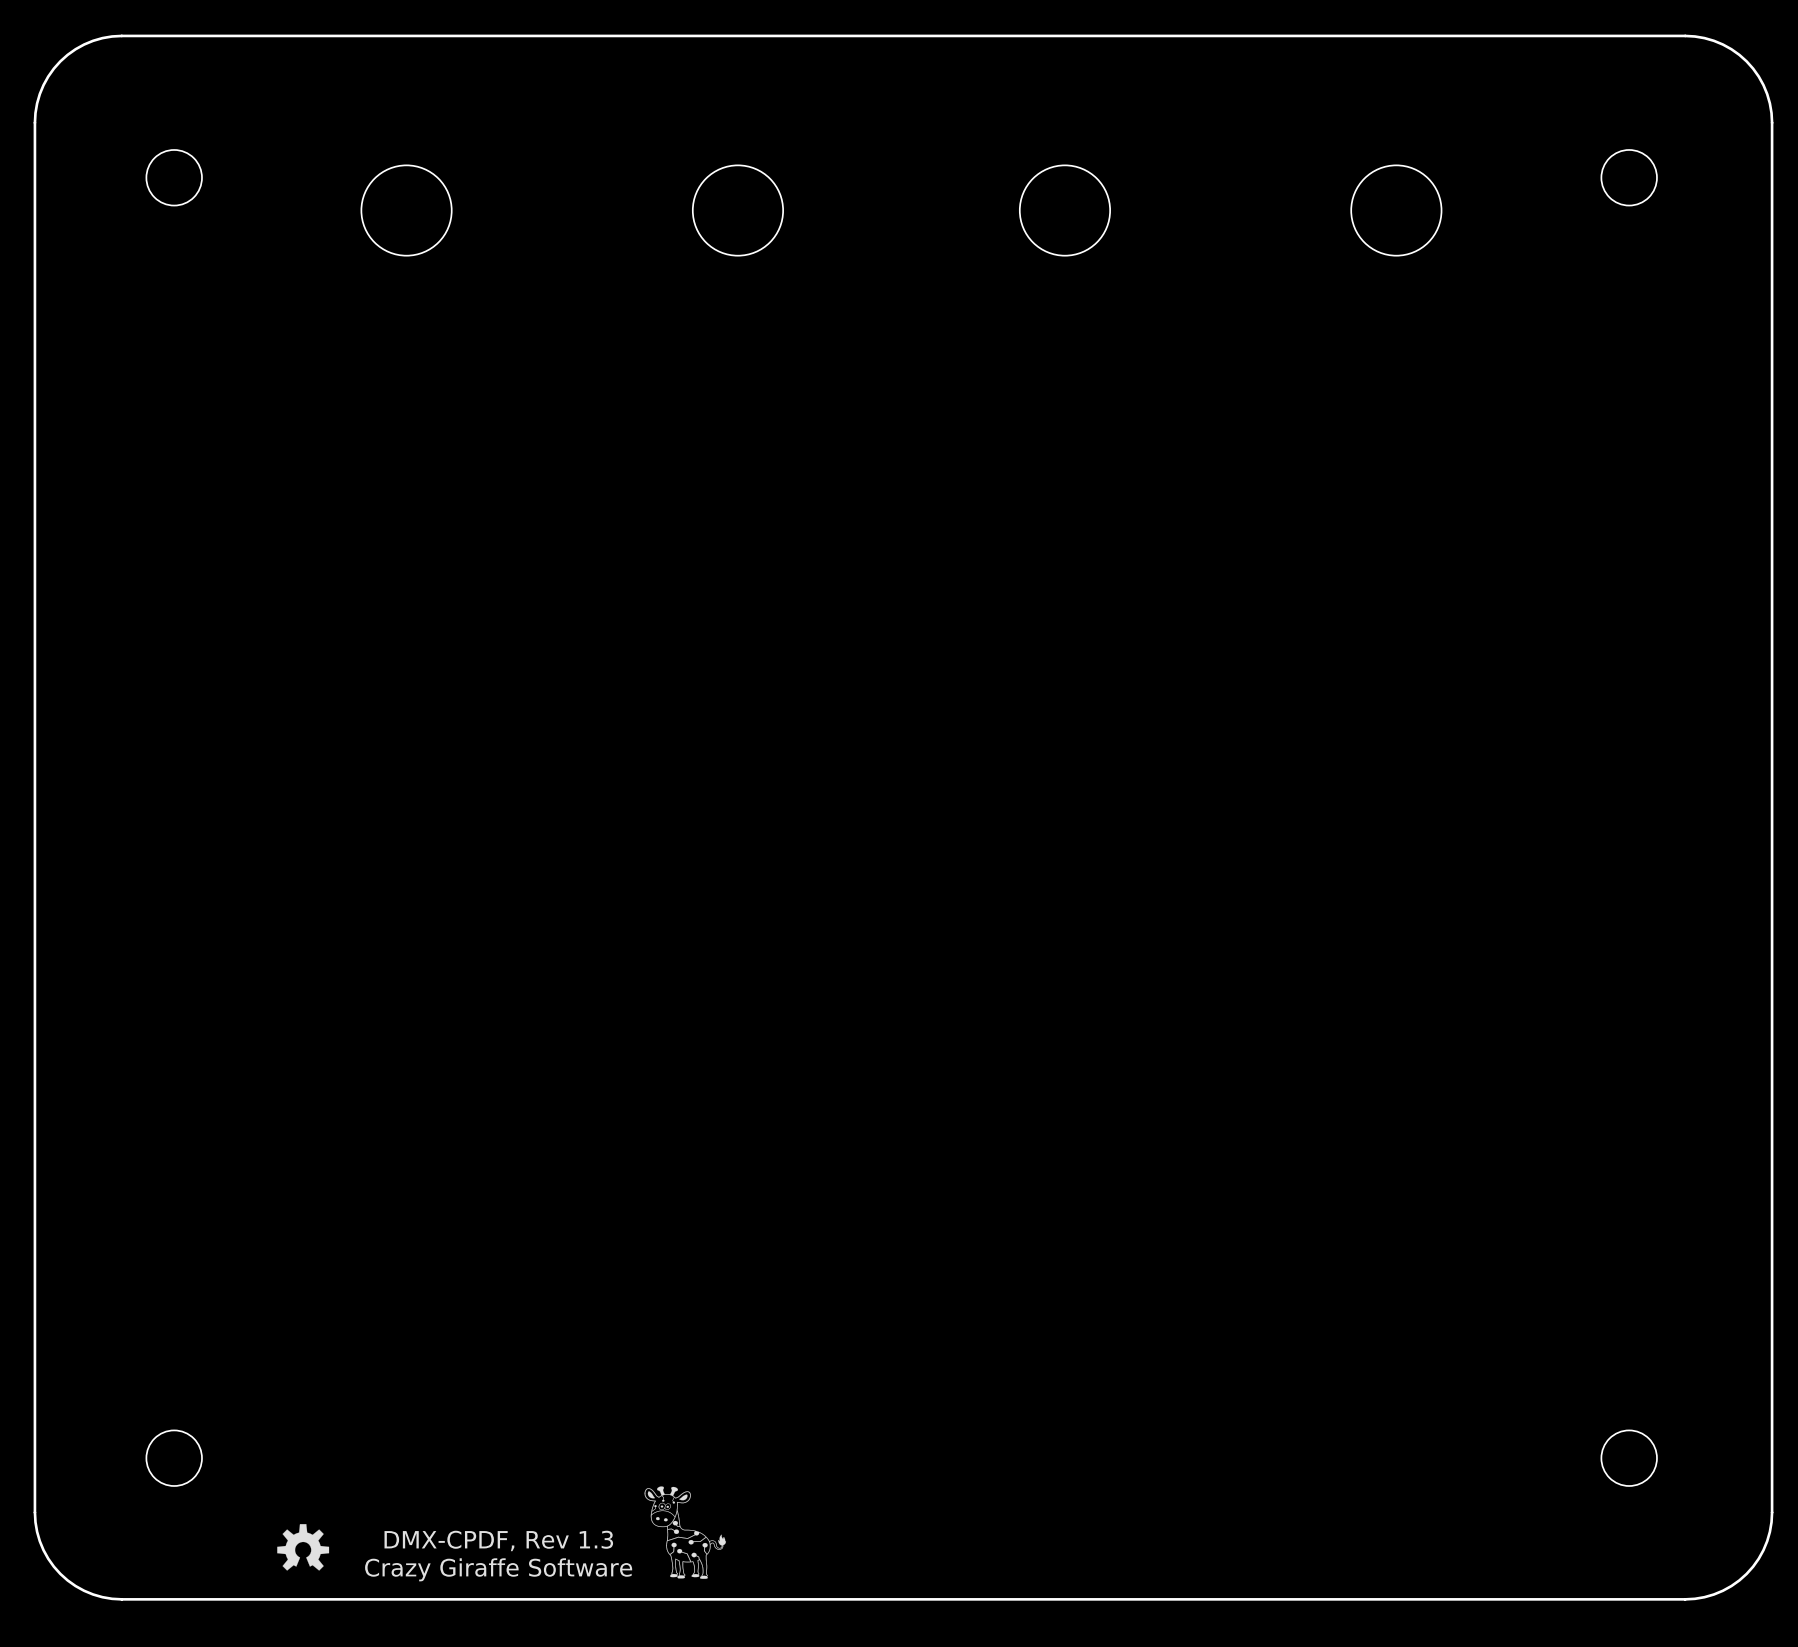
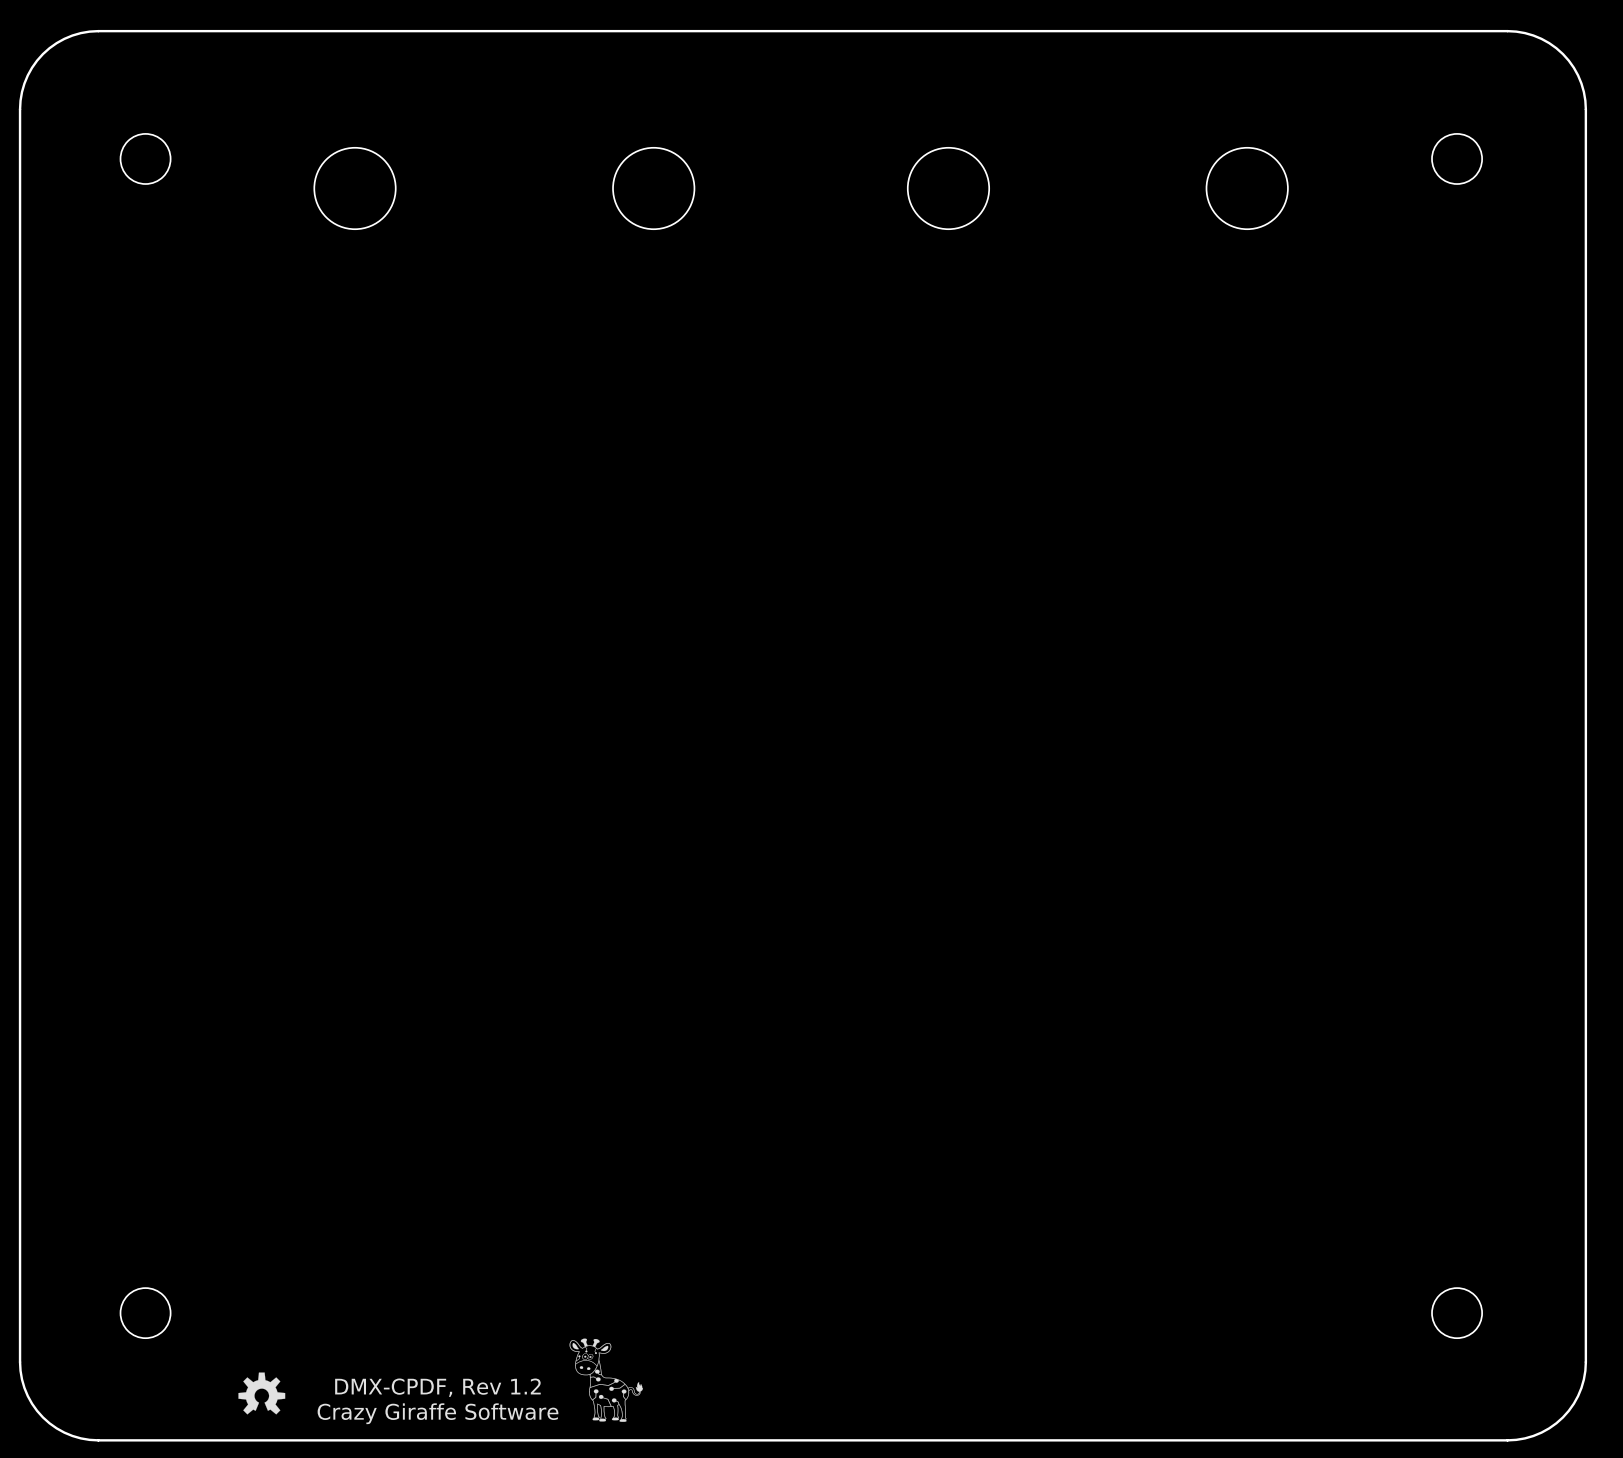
text: DMX-CPDF, Rev 1.3 (498, 1540) -> DMX-CPDF, Rev 1.2 (437, 1387)

